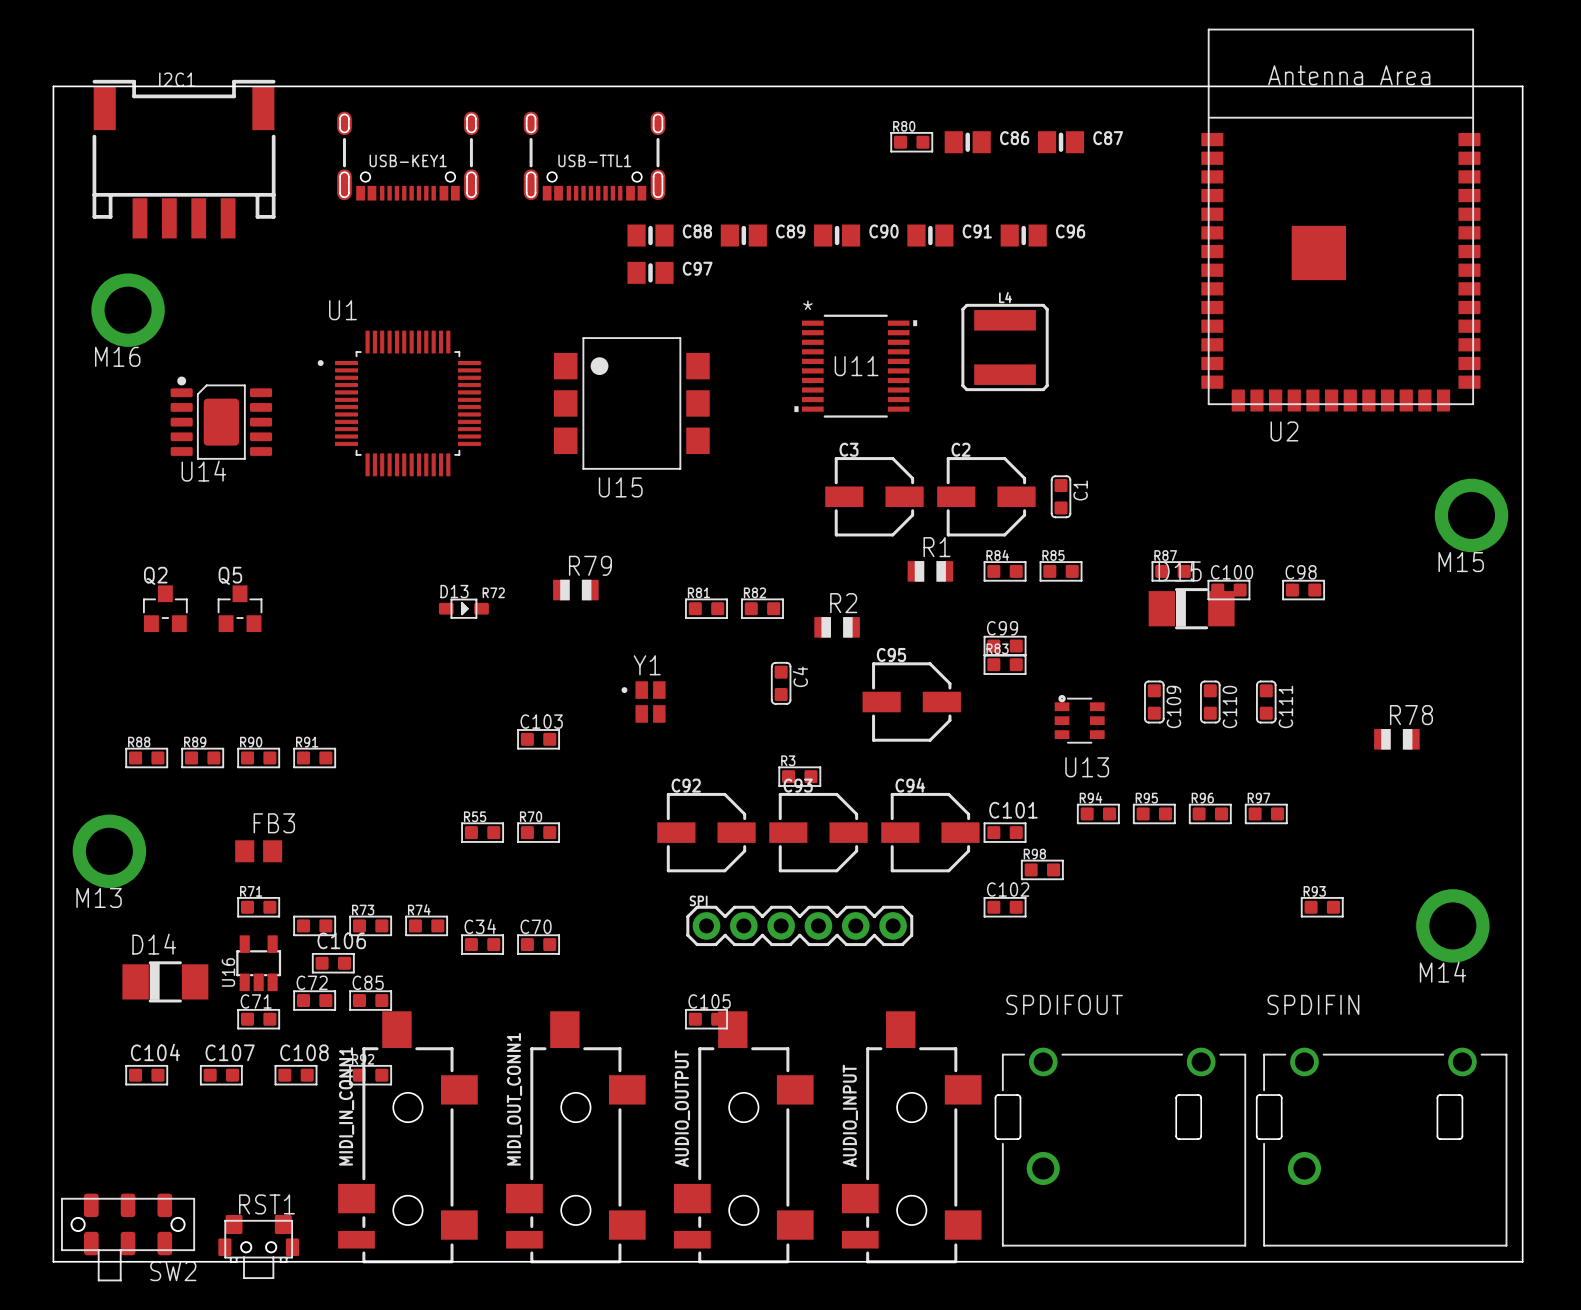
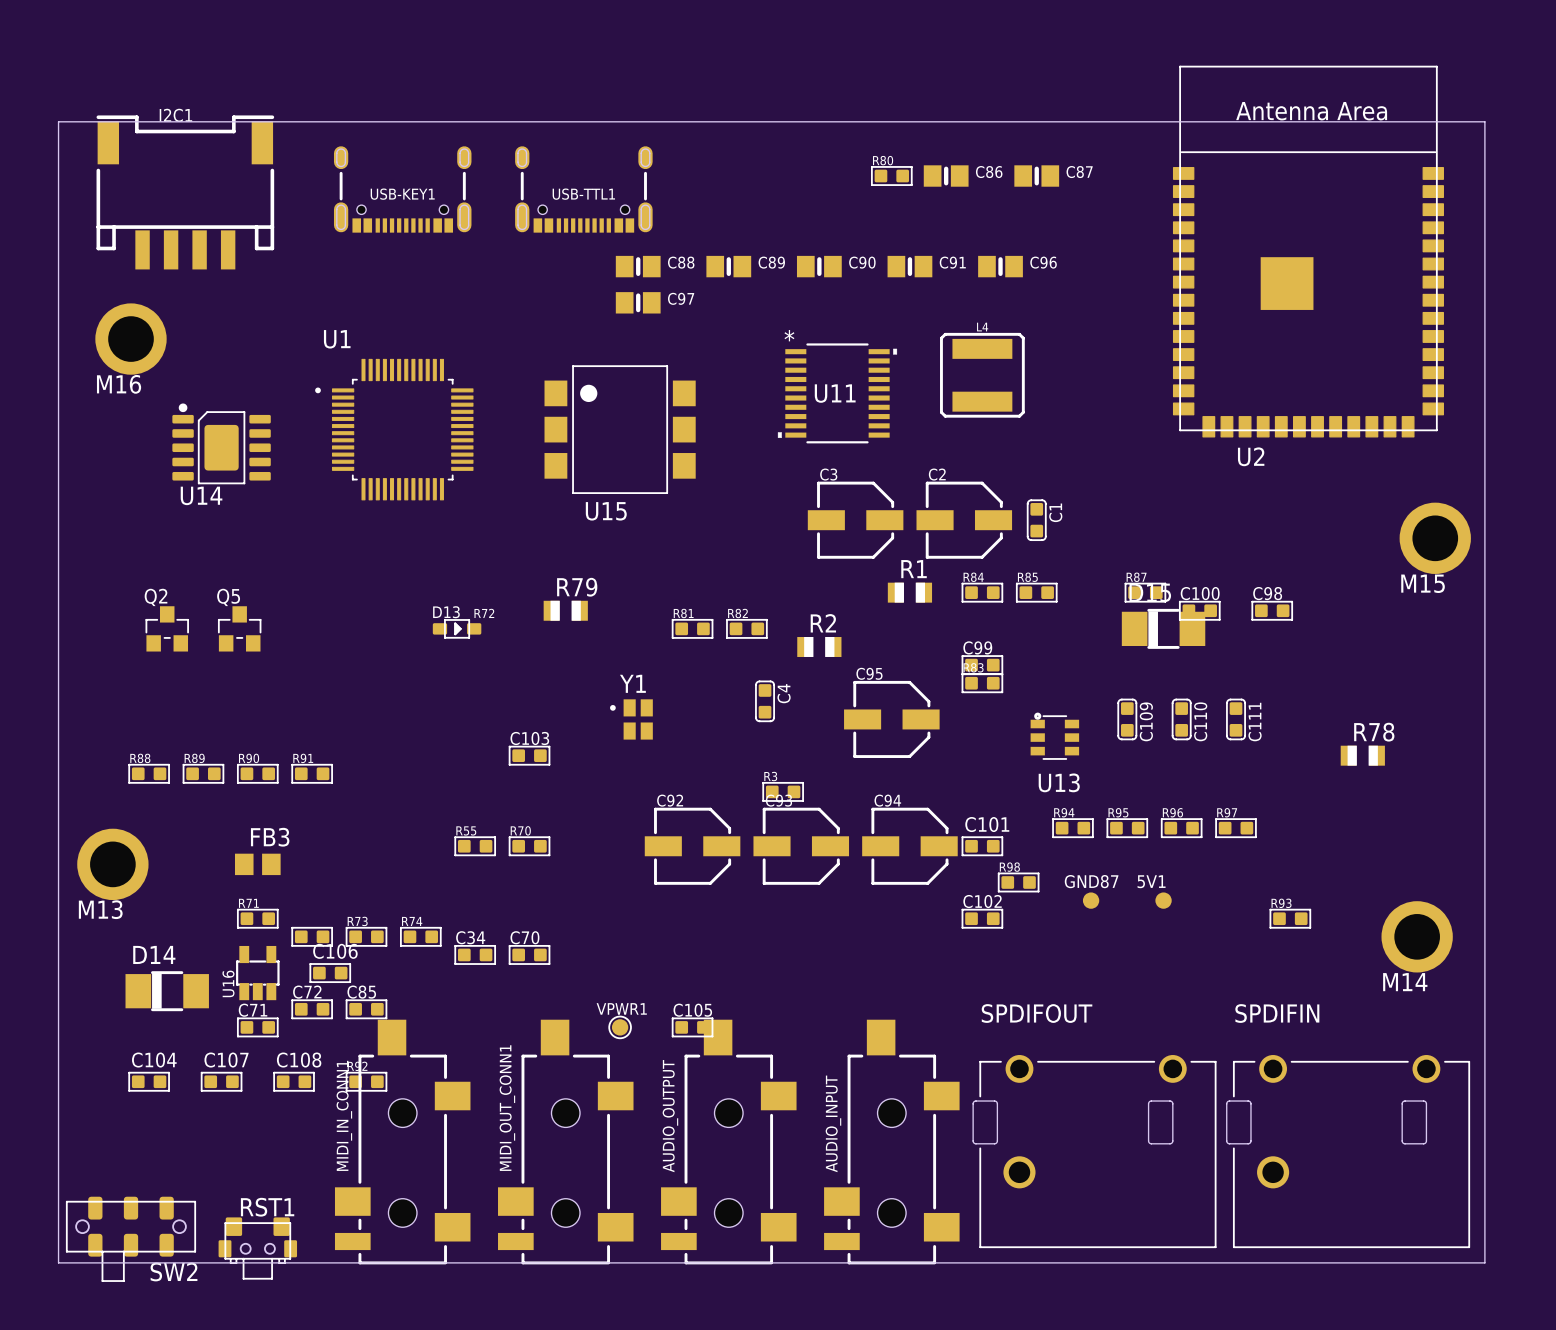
GND87: none -> (1091, 900)
5V1: none -> (1163, 900)
SPI: (799, 925) -> none
VPWR1: none -> (620, 1027)

